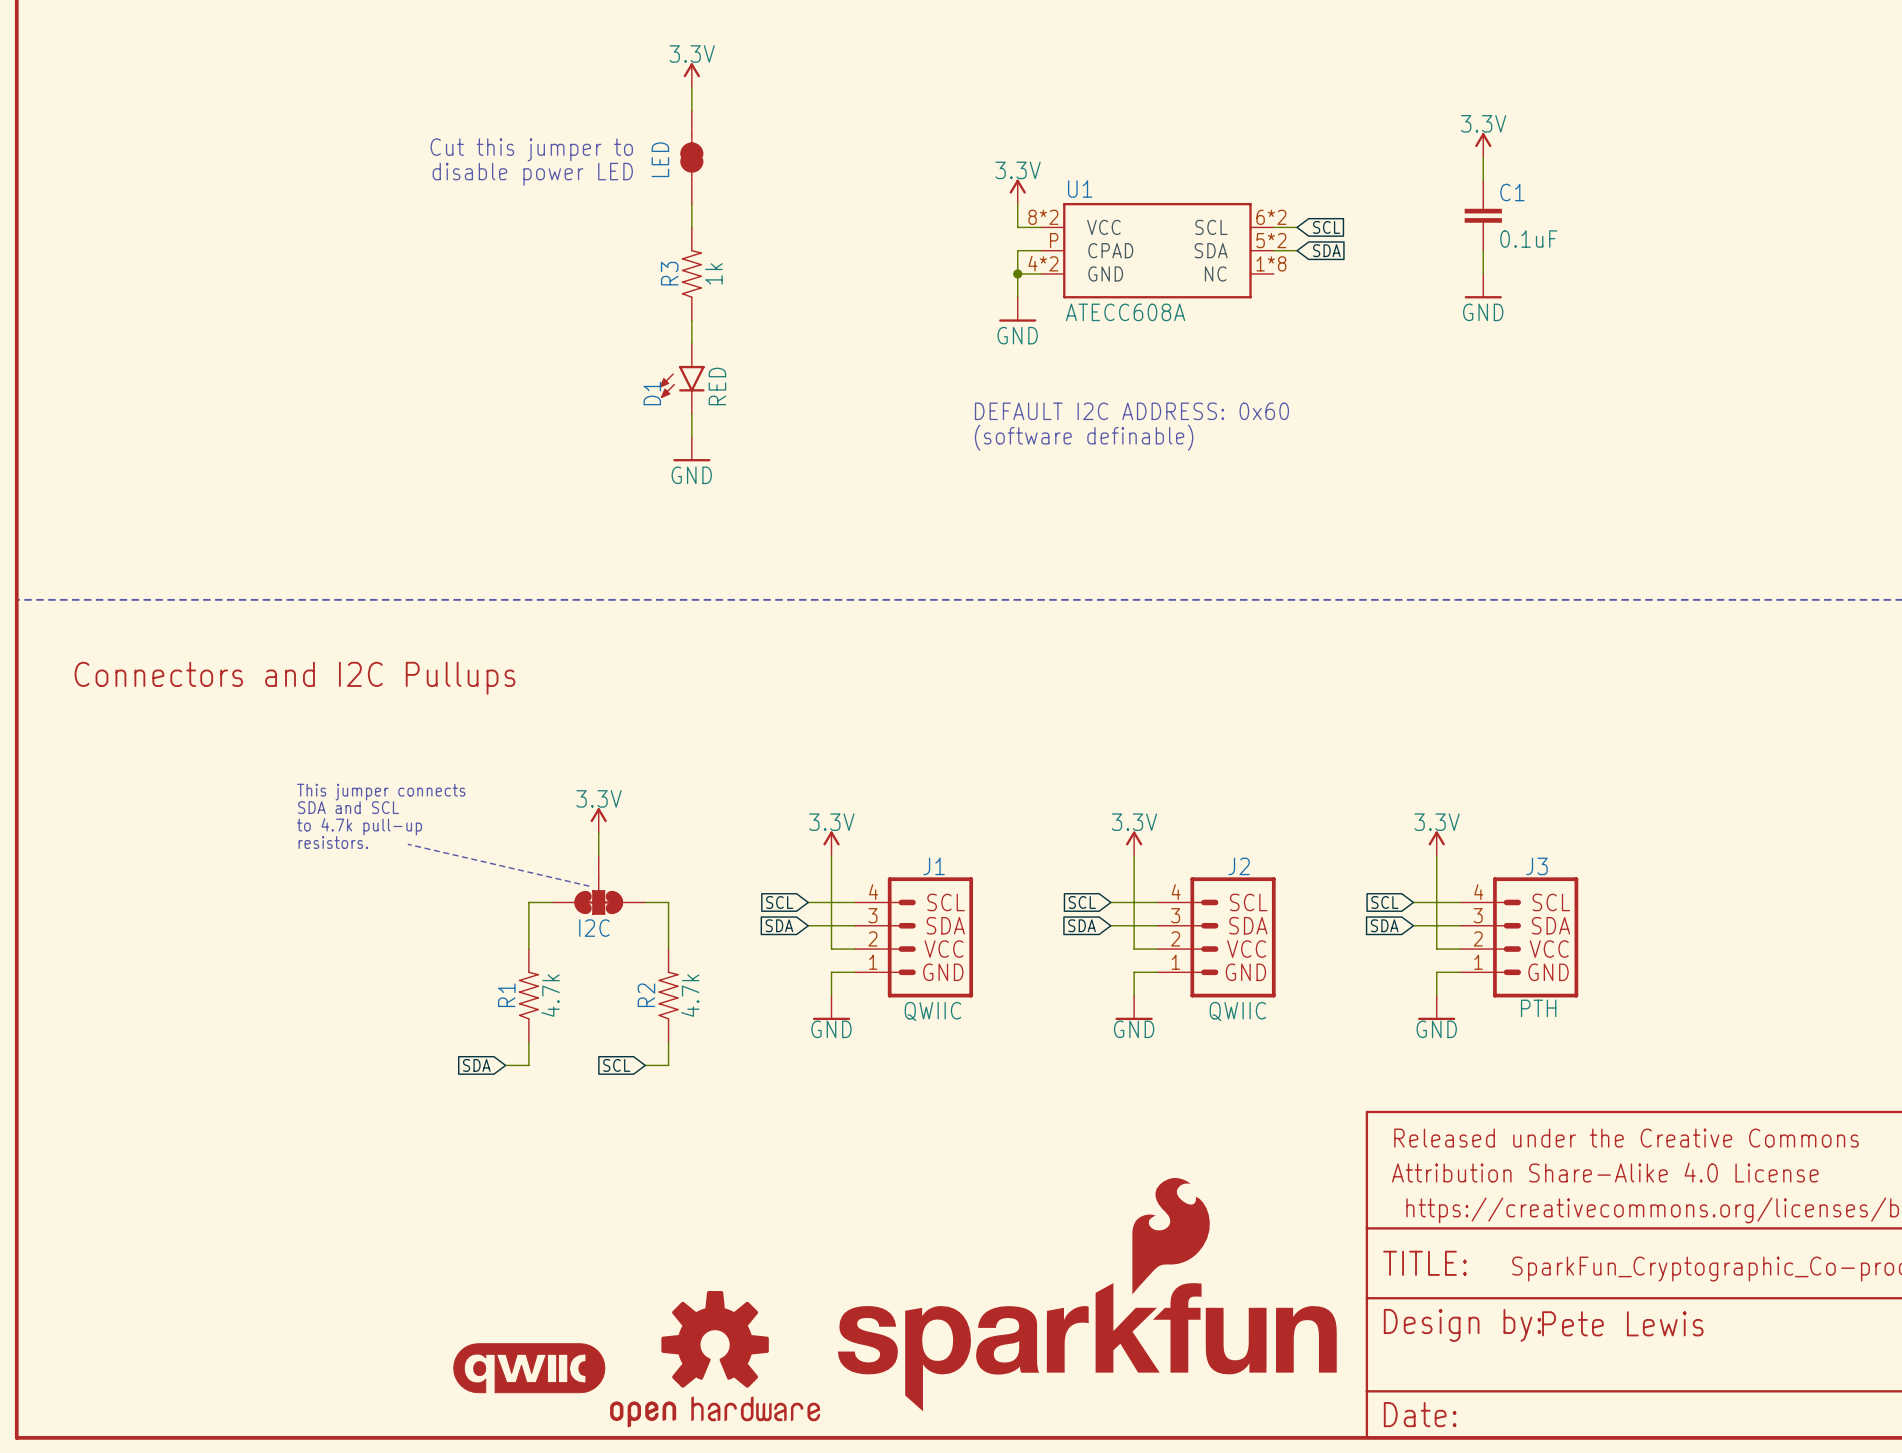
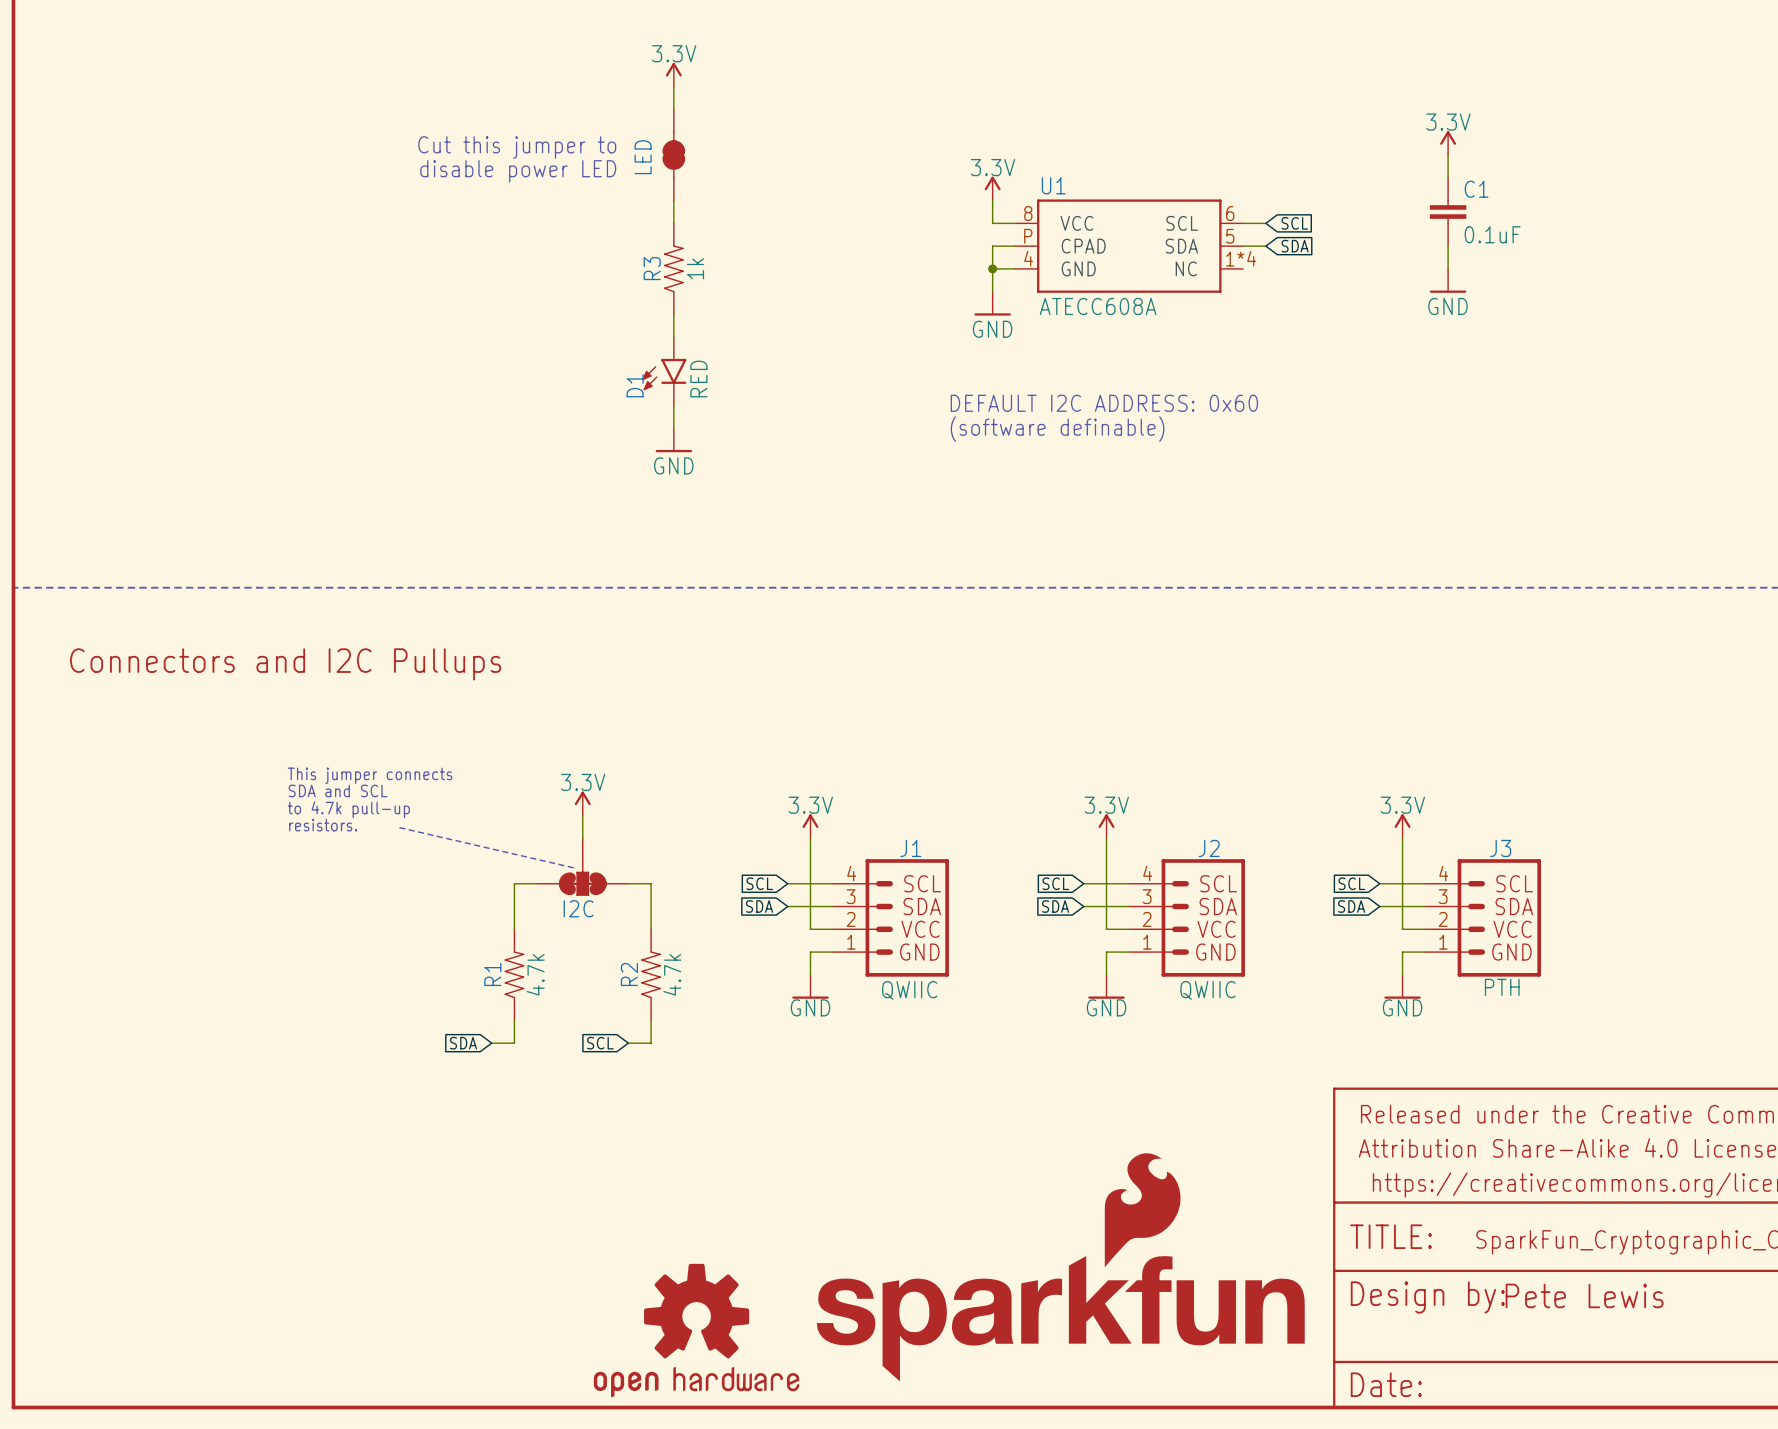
U1 pin number: 8*2 (1043, 217) -> 8 (1028, 213)
U1 pin number: 6*2 (1271, 217) -> 6 (1230, 213)
U1 pin number: 5*2 (1271, 240) -> 5 (1230, 236)
U1 pin number: 4*2 (1043, 263) -> 4 (1028, 258)
U1 pin number: 1*8 (1271, 263) -> 1*4 (1241, 258)
part: (529, 1368) -> none

